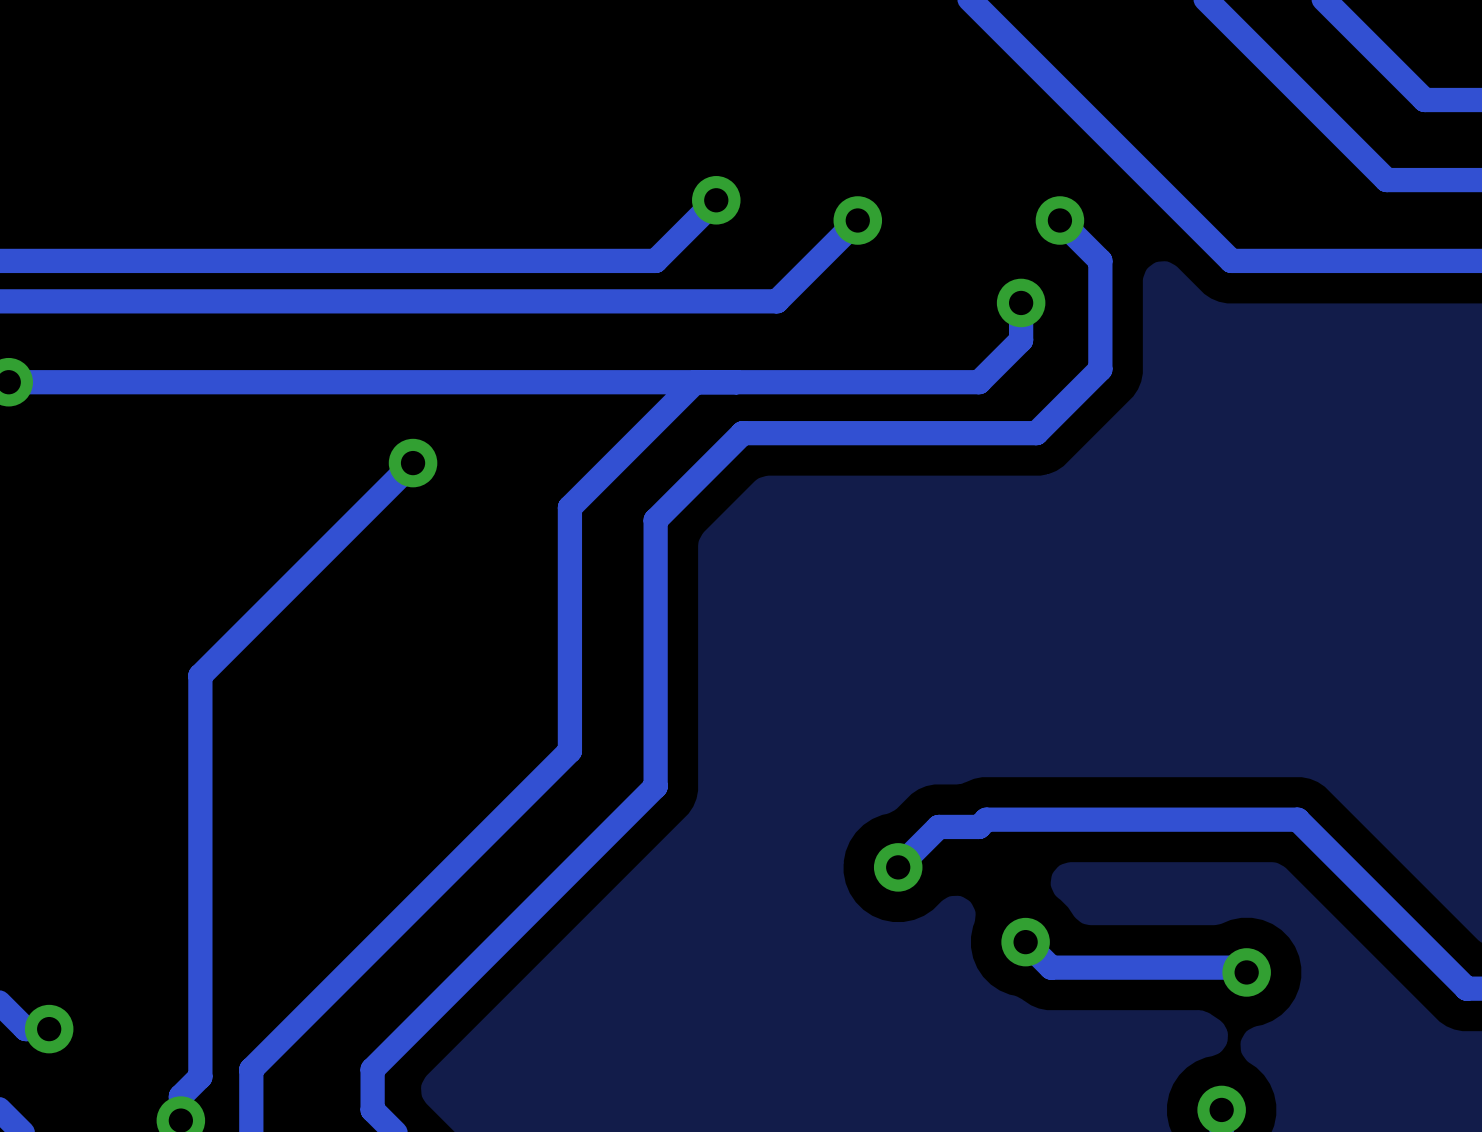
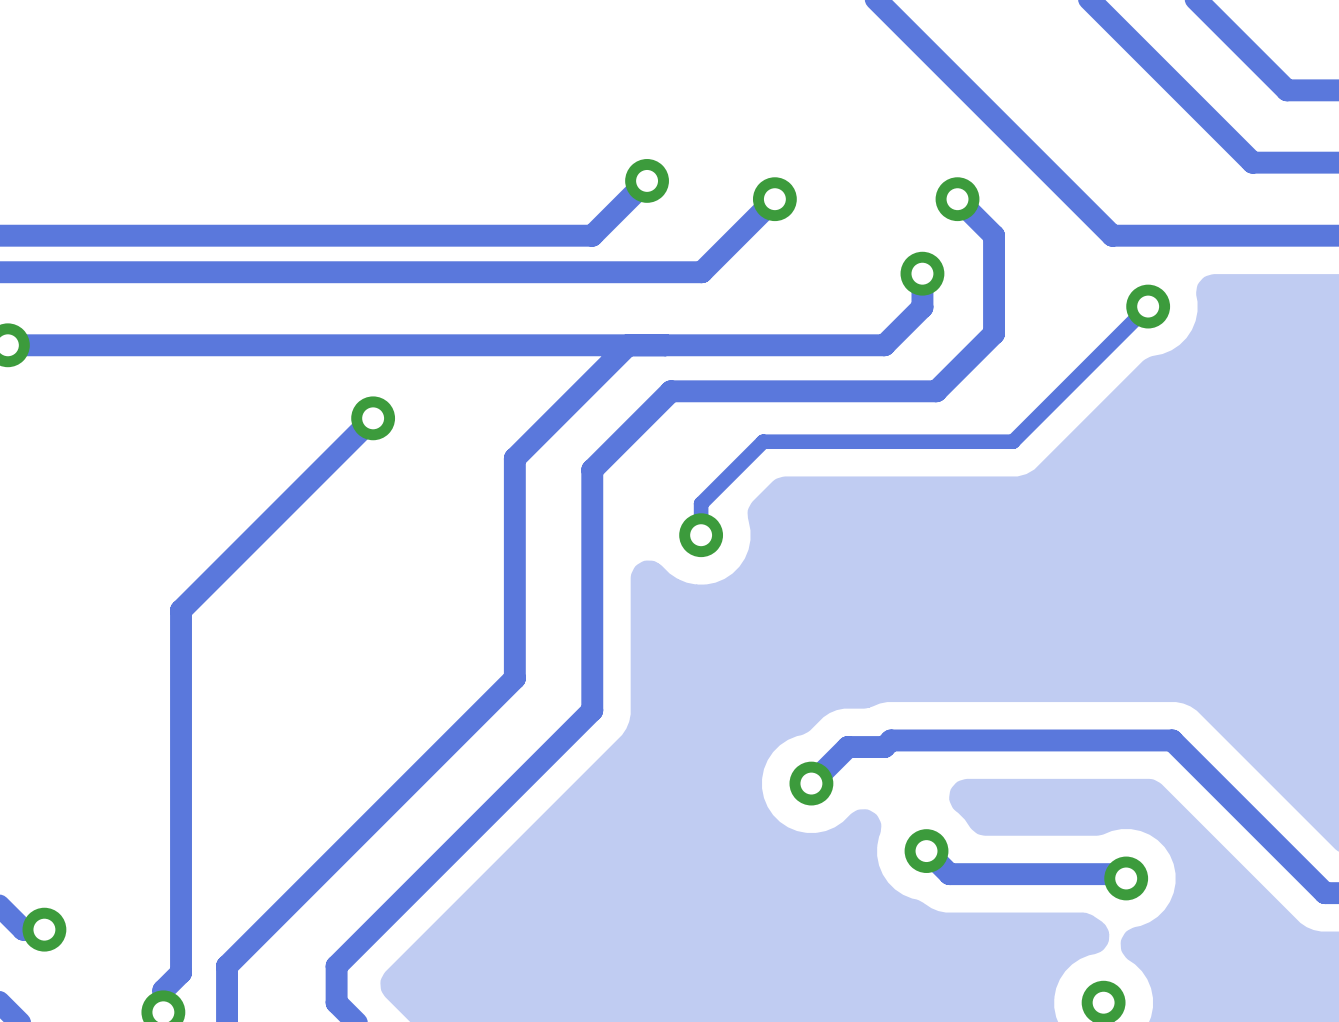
track: none -> (1148, 306) (1013, 441) (763, 441) (701, 503) (701, 535)
via: none -> (1148, 306)
via: none -> (701, 535)

